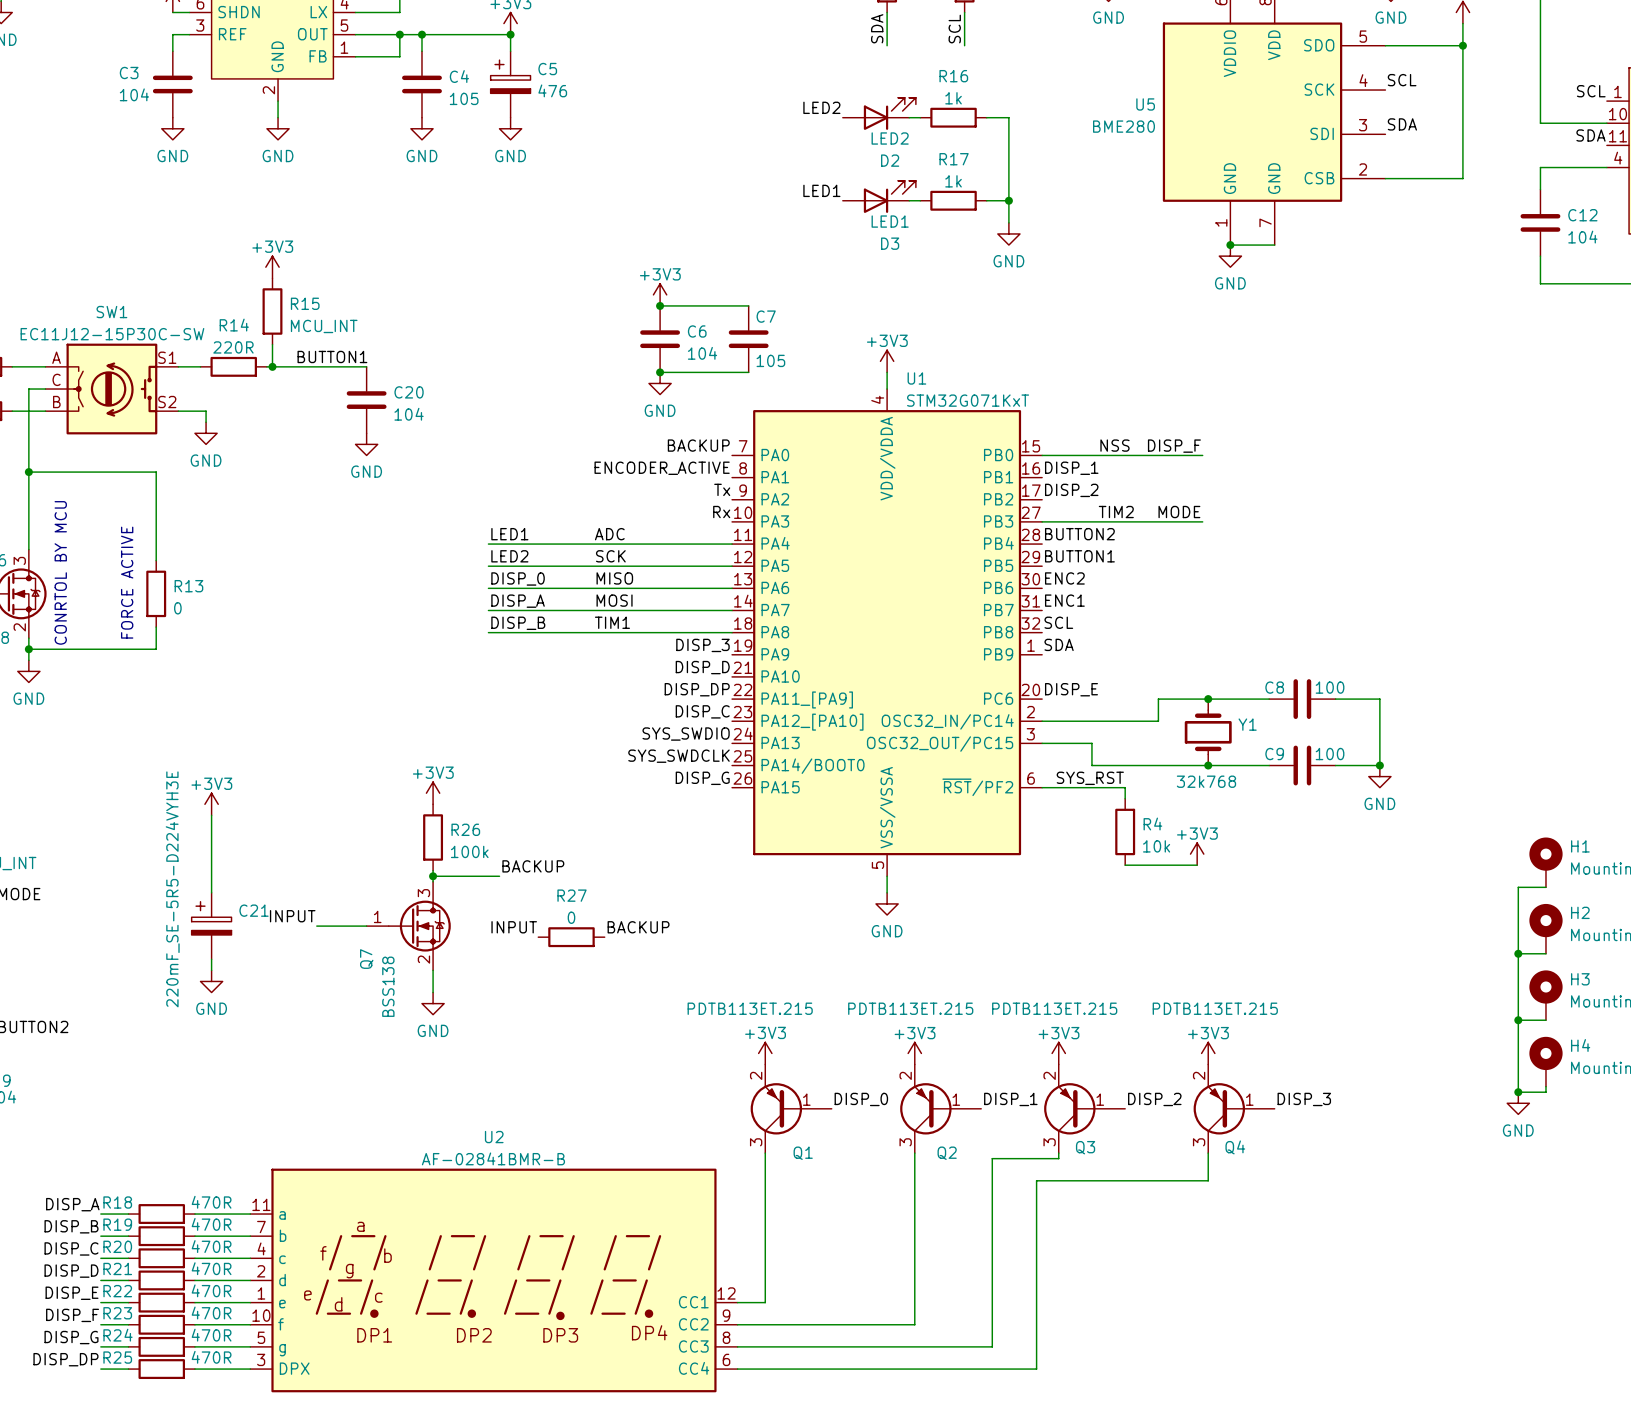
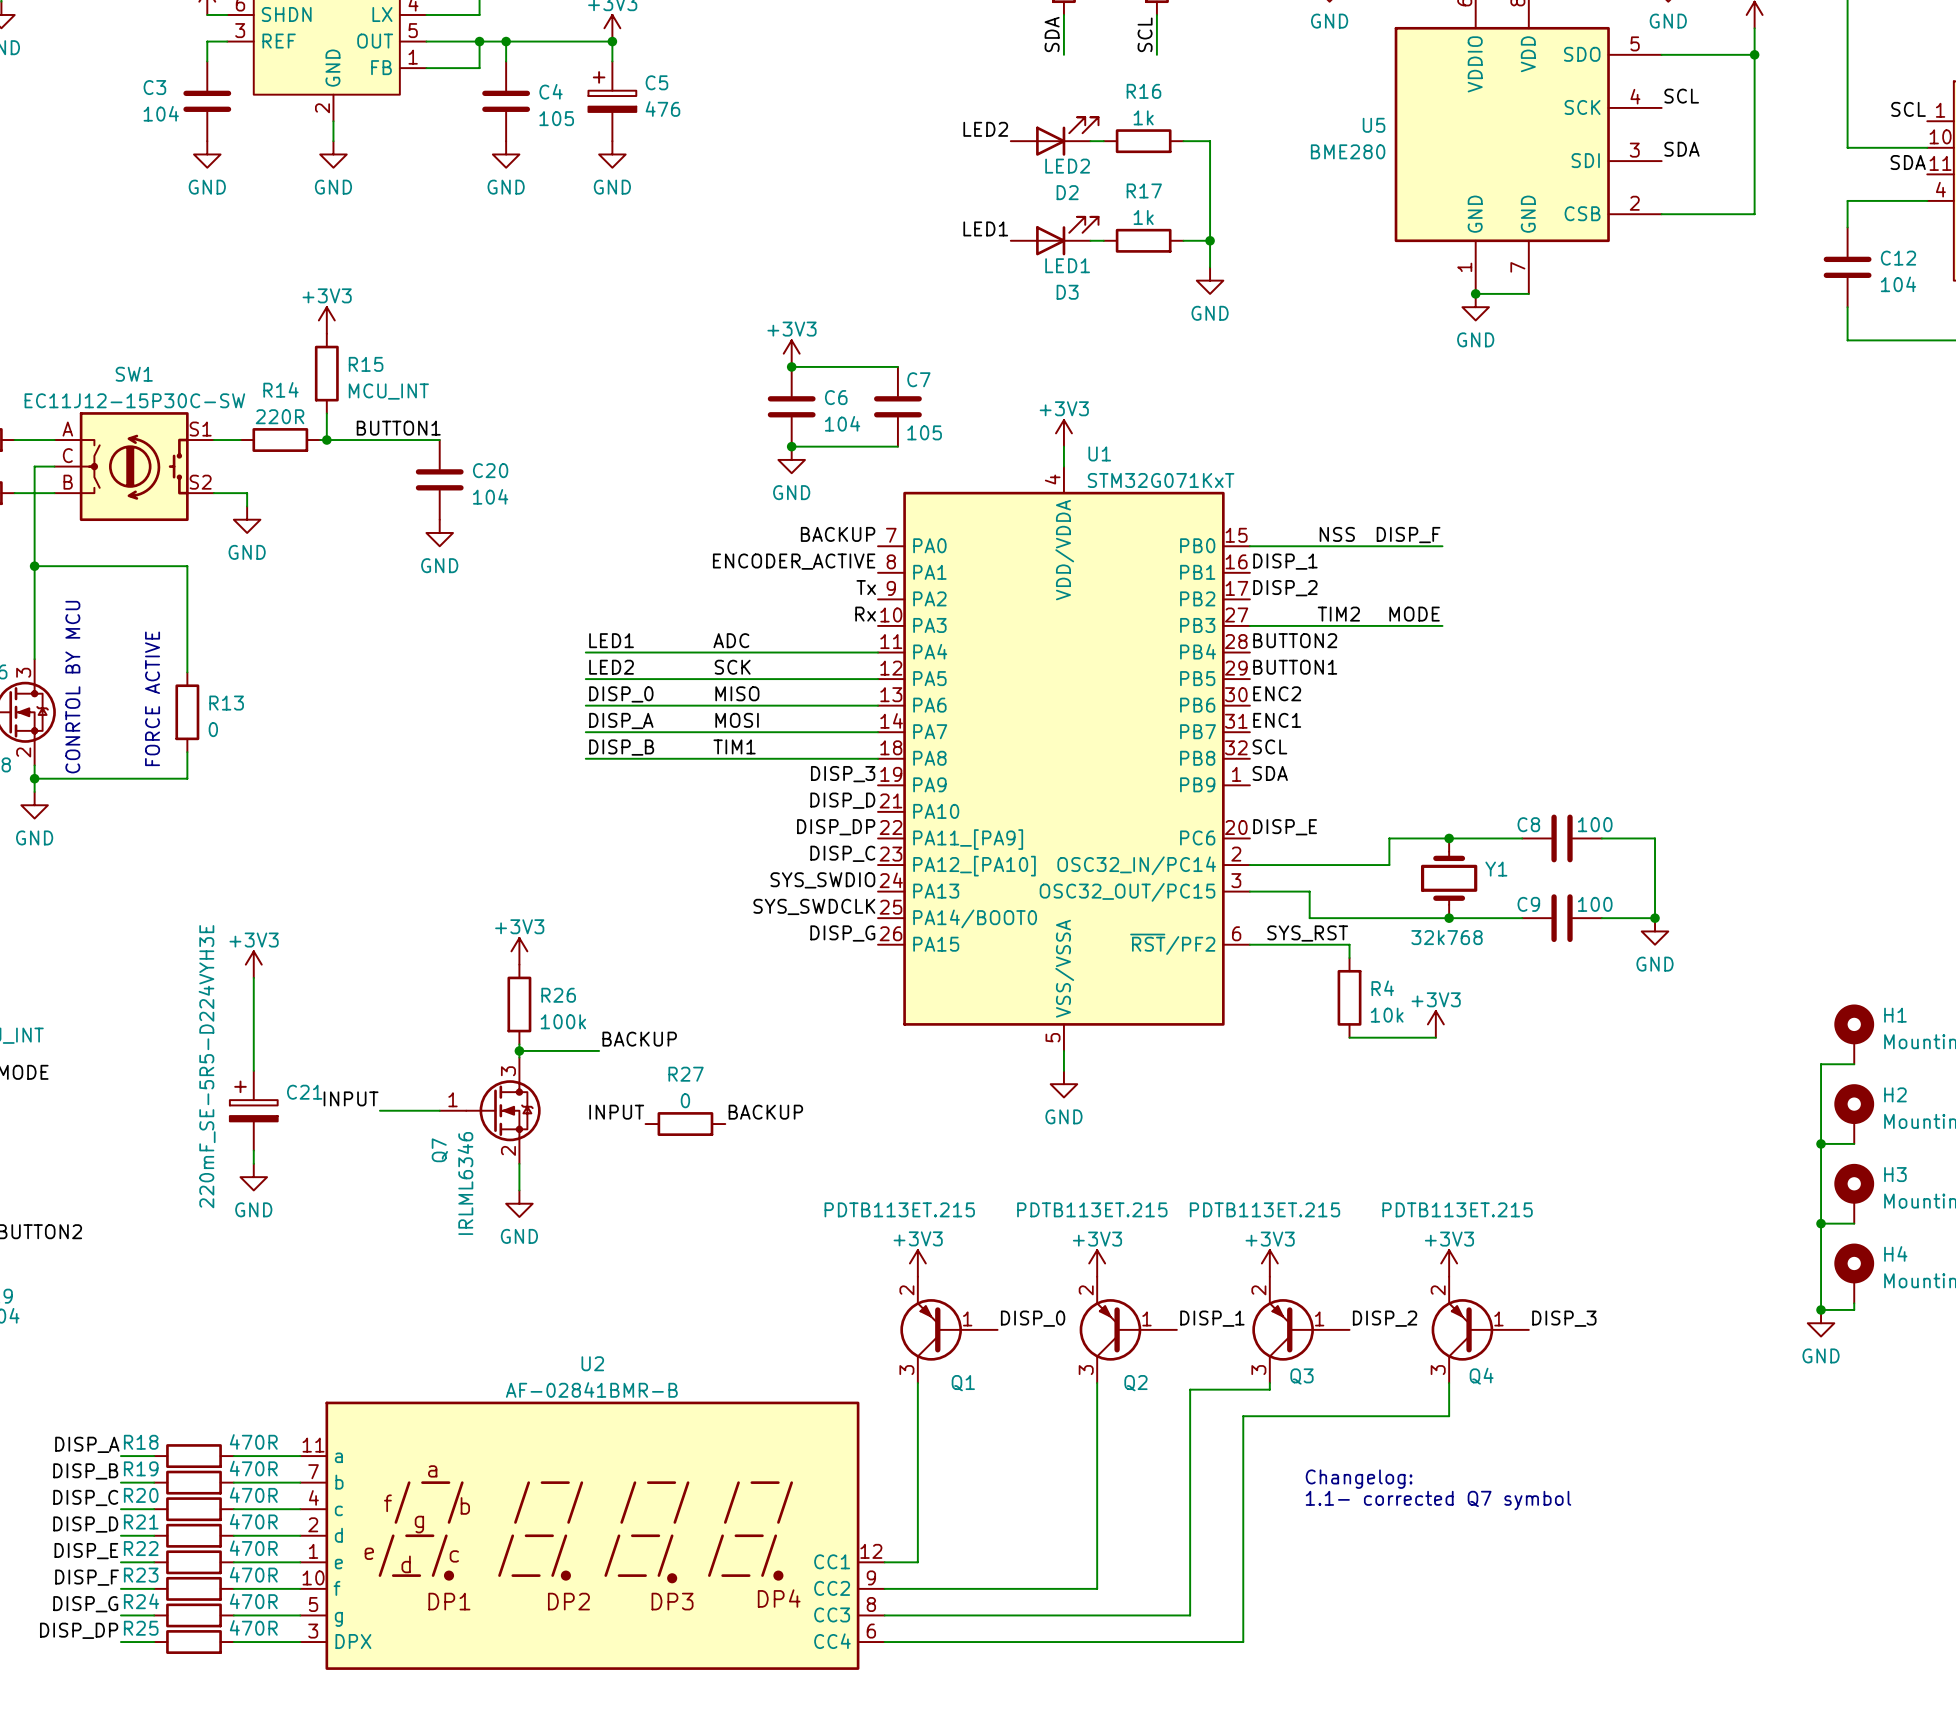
Q7 value: BSS138 (388, 986) -> IRLML6346 (465, 1183)
text: none -> Changelog: (1359, 1479)
text: none -> 1.1- corrected Q7 symbol (1438, 1500)

